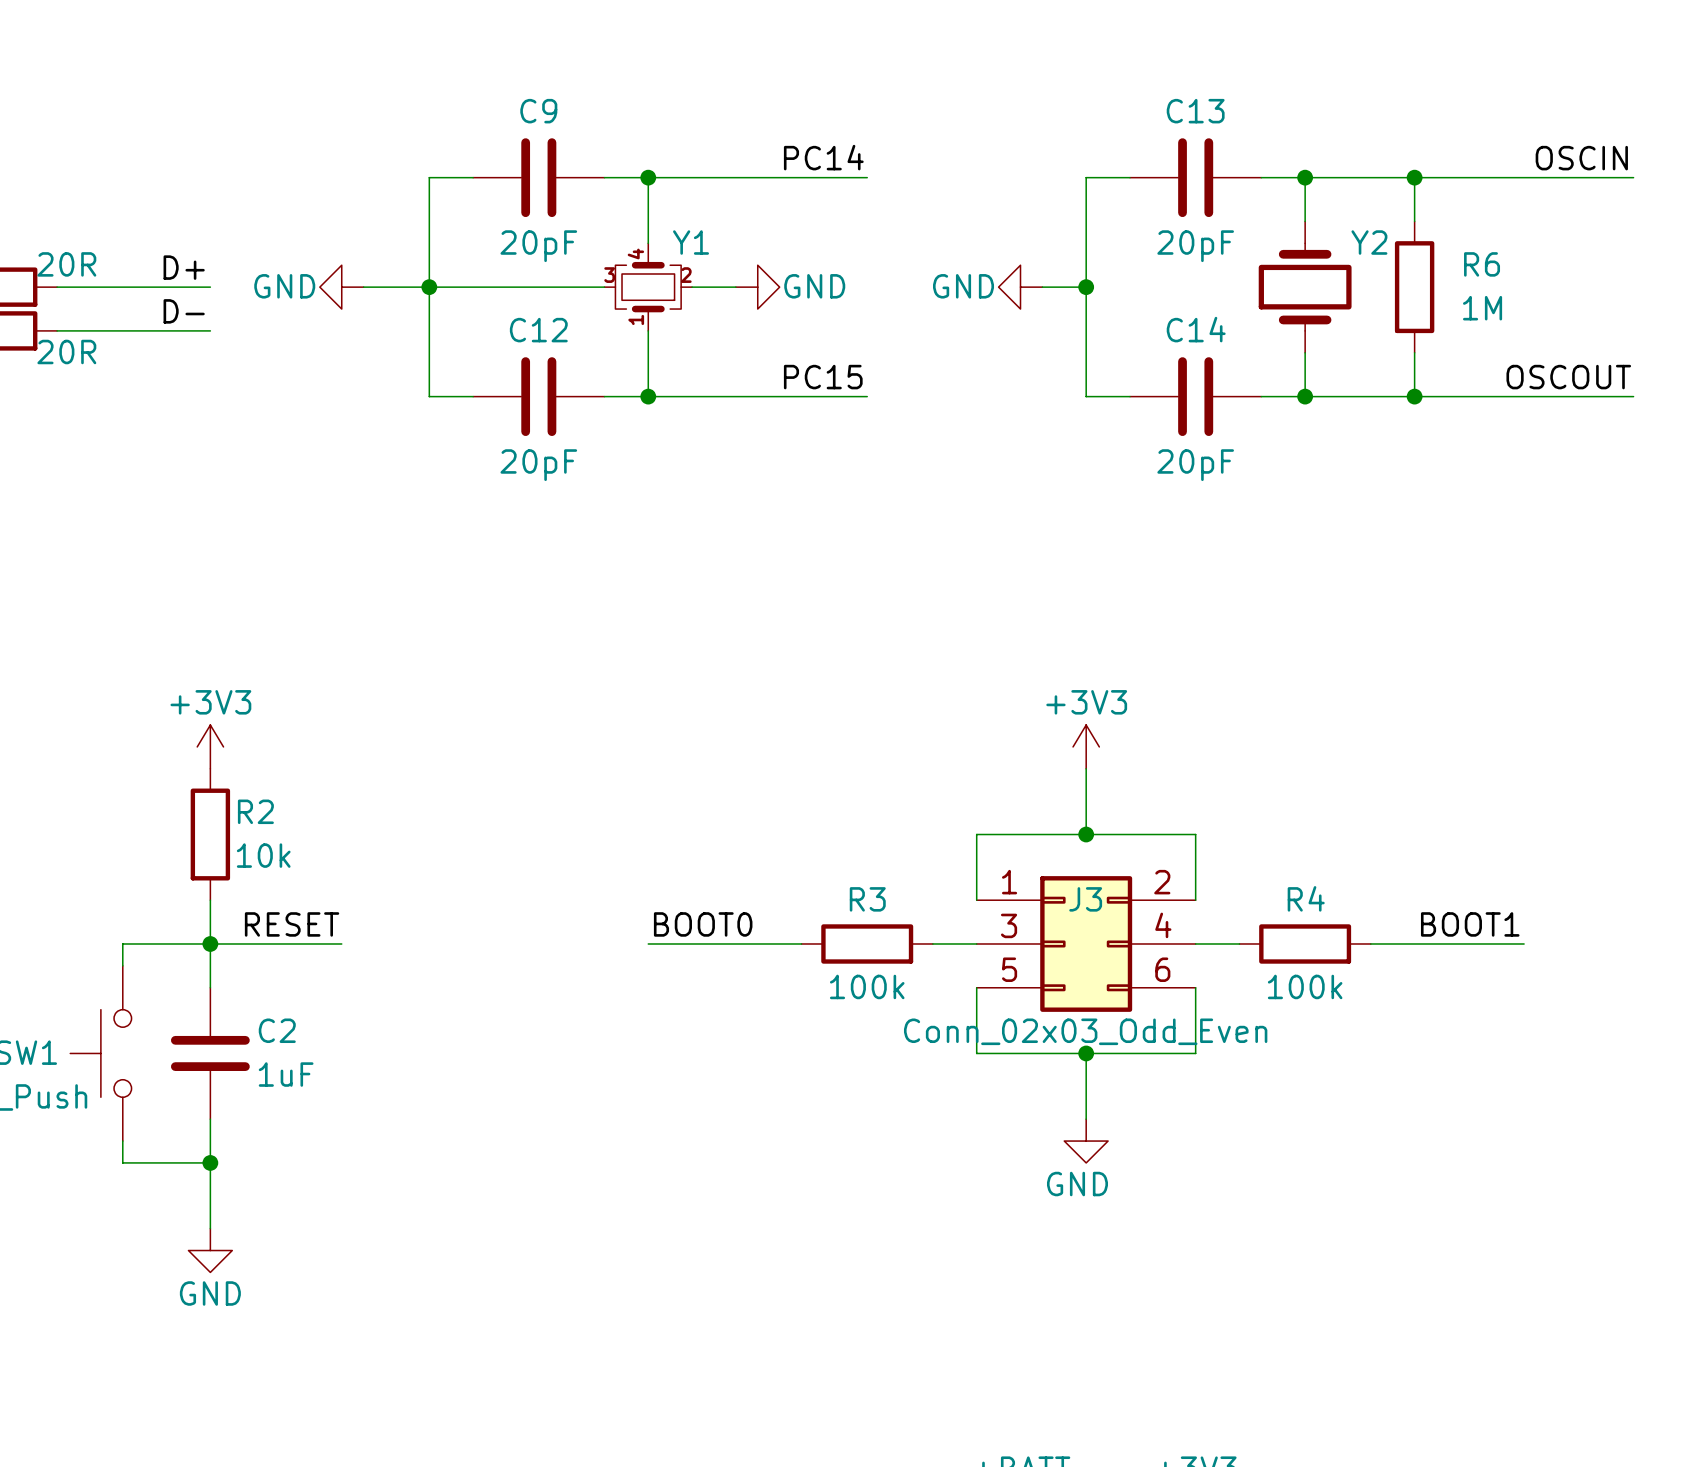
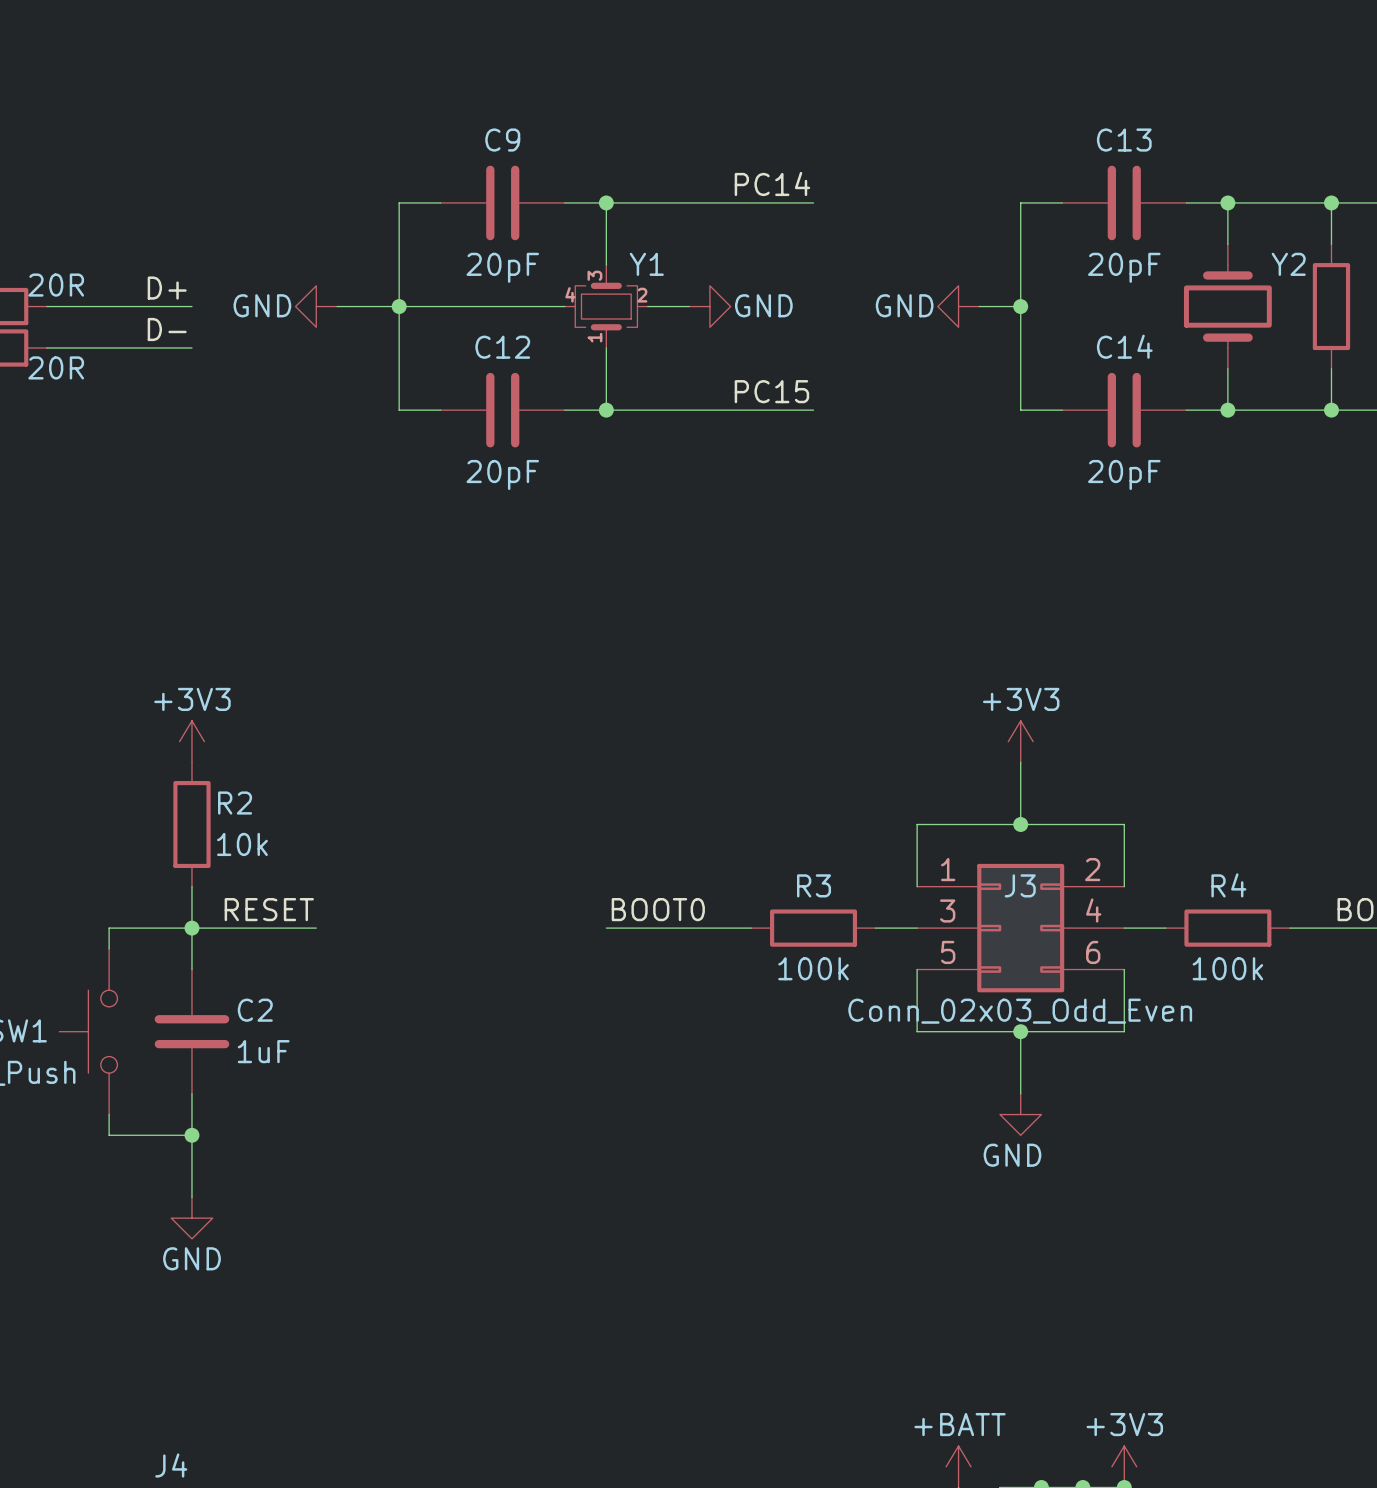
Y1 pin number: 4 (635, 253) -> 3 (594, 275)
Y1 pin number: 3 (609, 275) -> 4 (570, 294)

